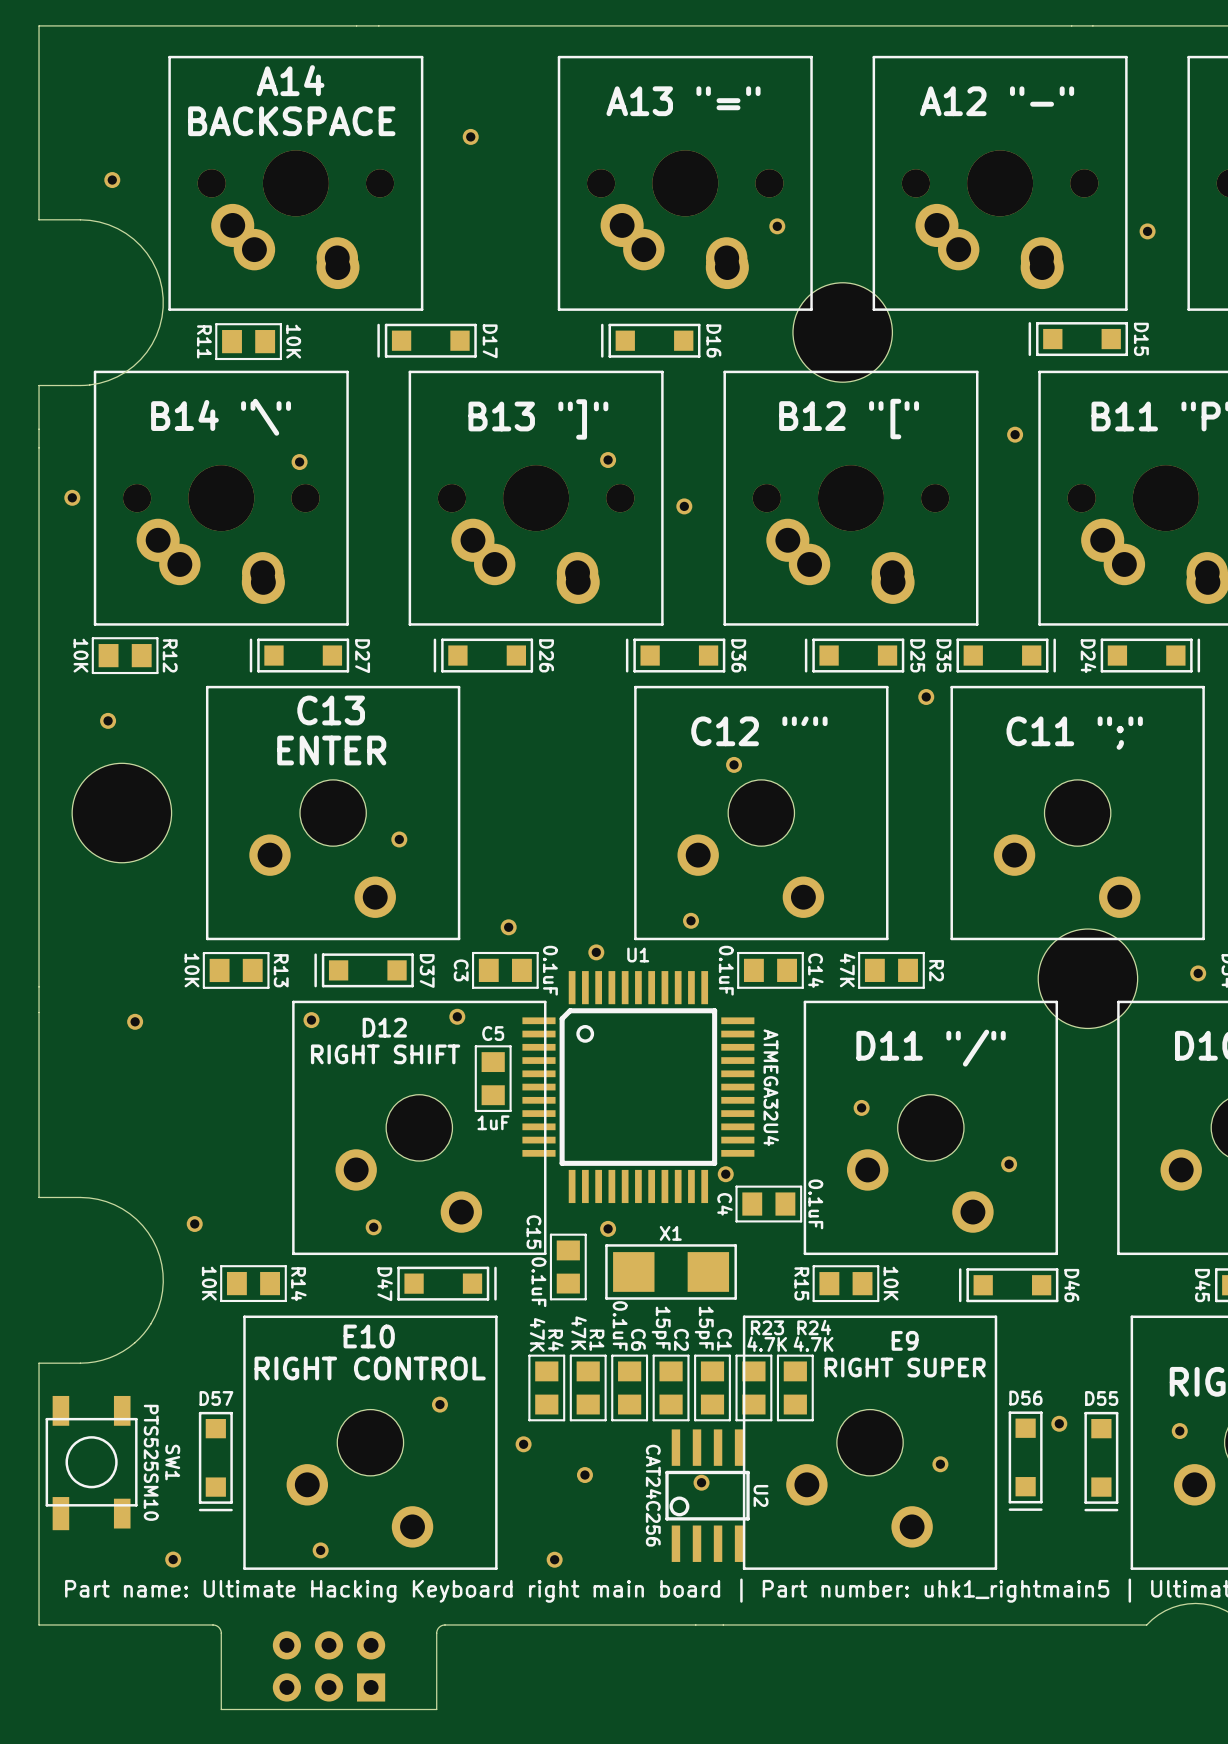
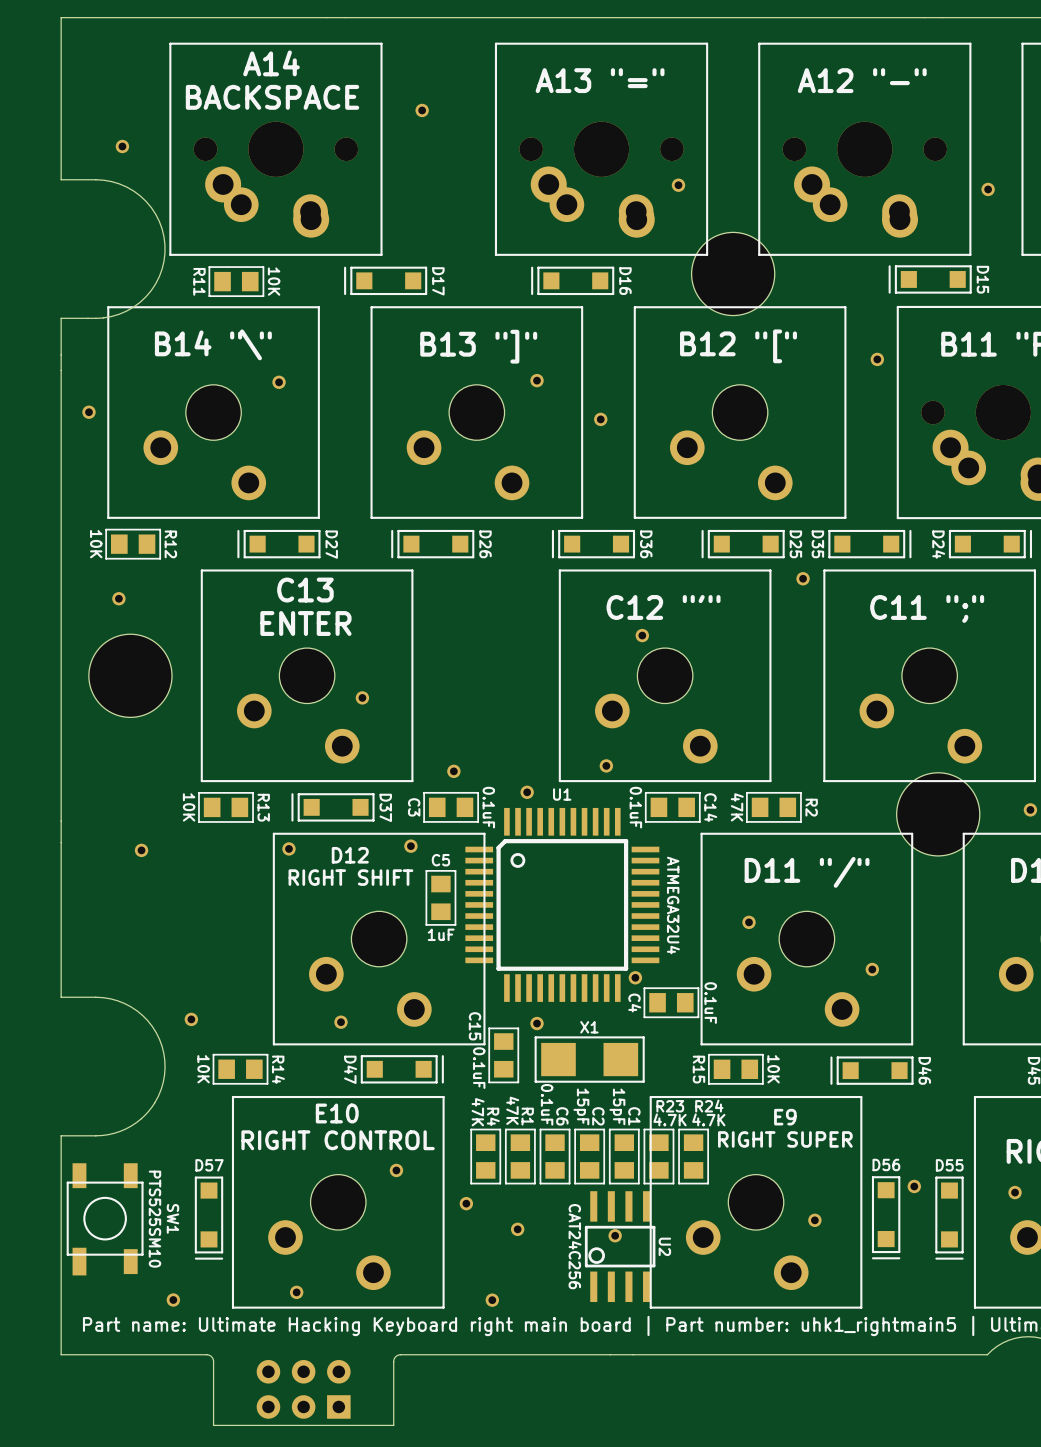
part footprint: [93, 370, 349, 626] -> [107, 306, 320, 519]
part footprint: [408, 370, 664, 626] -> [370, 306, 584, 519]
part footprint: [723, 370, 979, 626] -> [633, 306, 847, 519]

